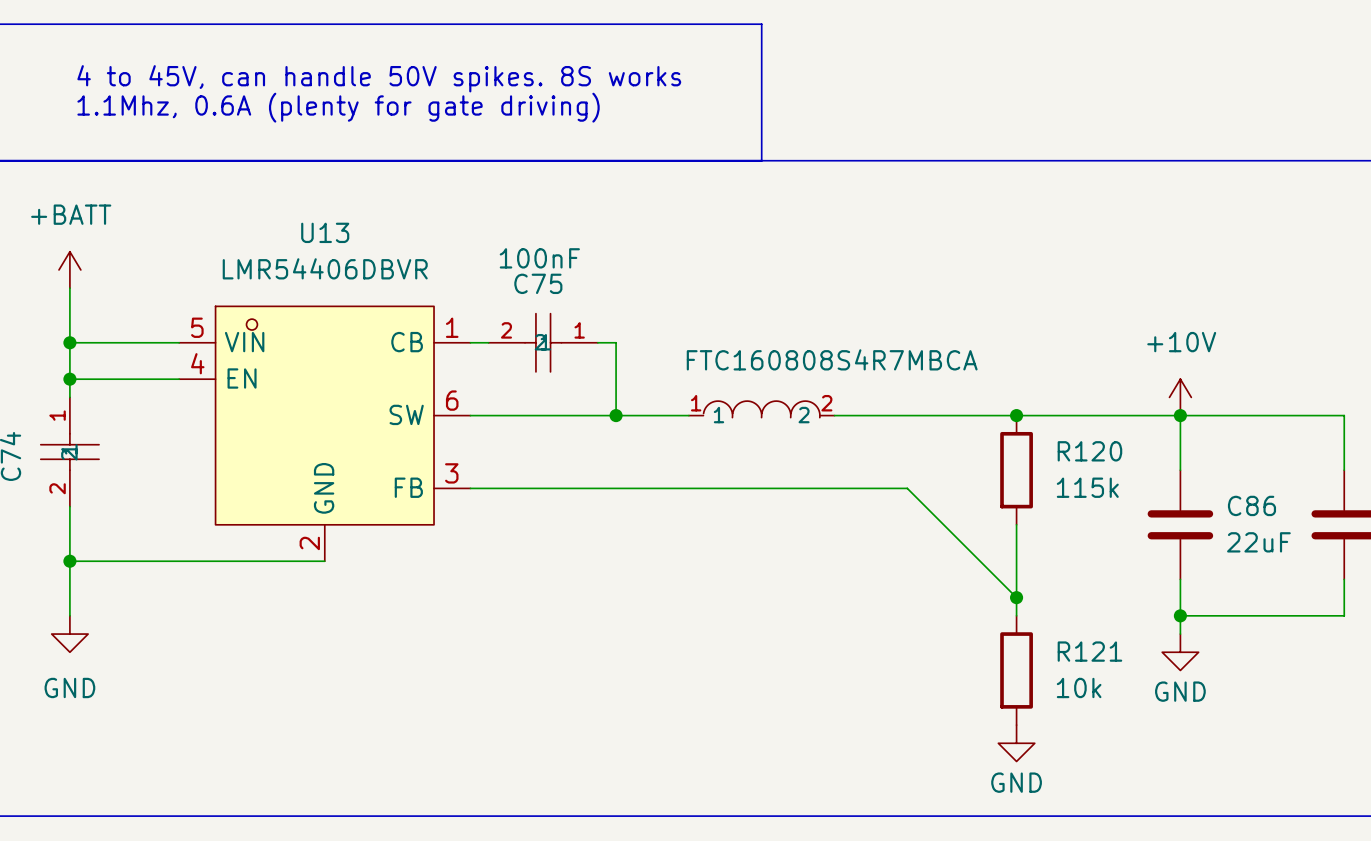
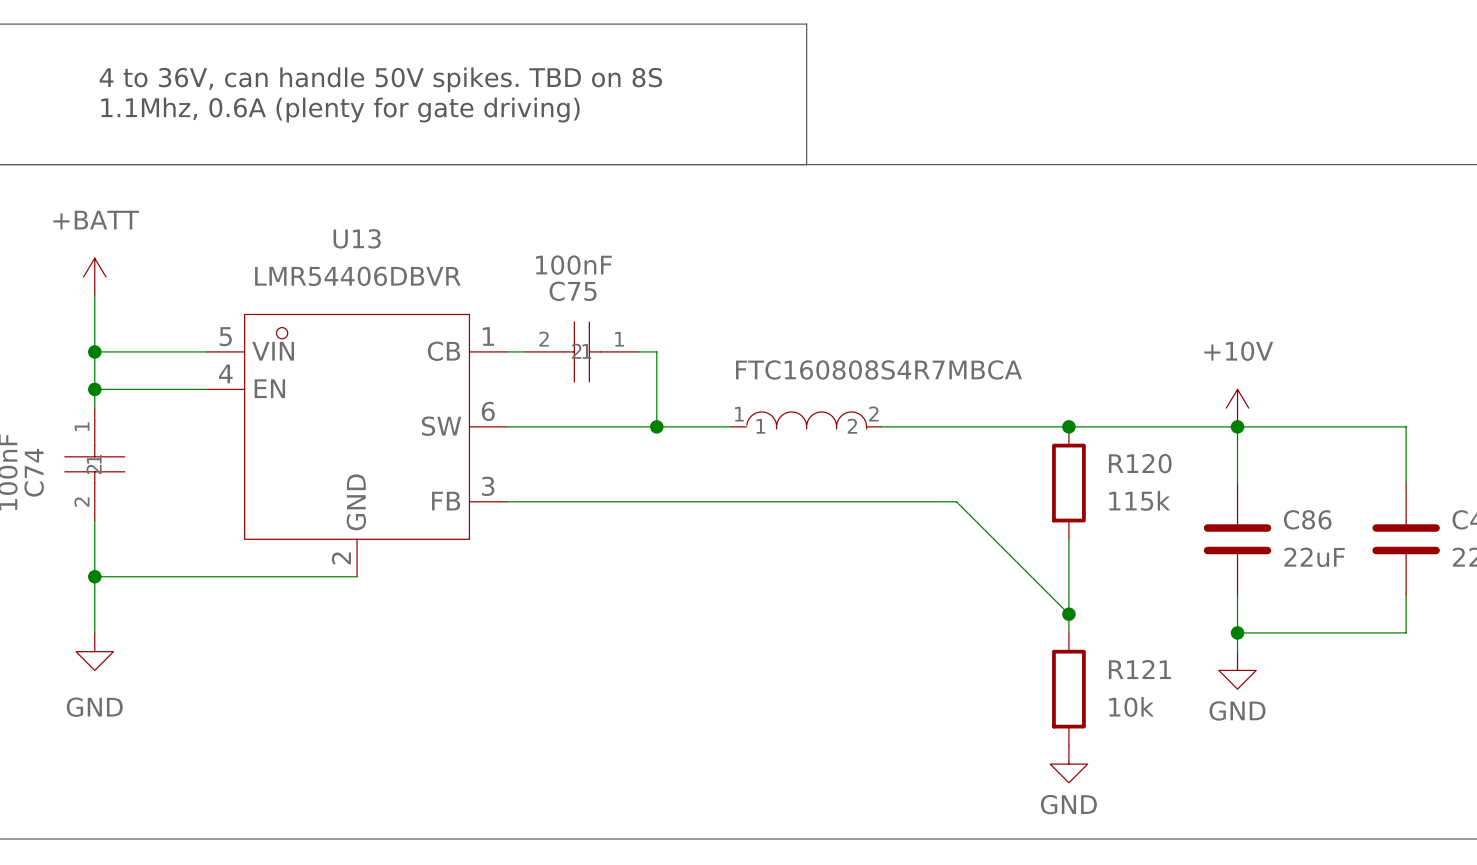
text: 4 to 45V, can handle 50V spikes. 8S works (379, 78) -> 4 to 36V, can handle 50V spikes. TBD on 8S (380, 79)

